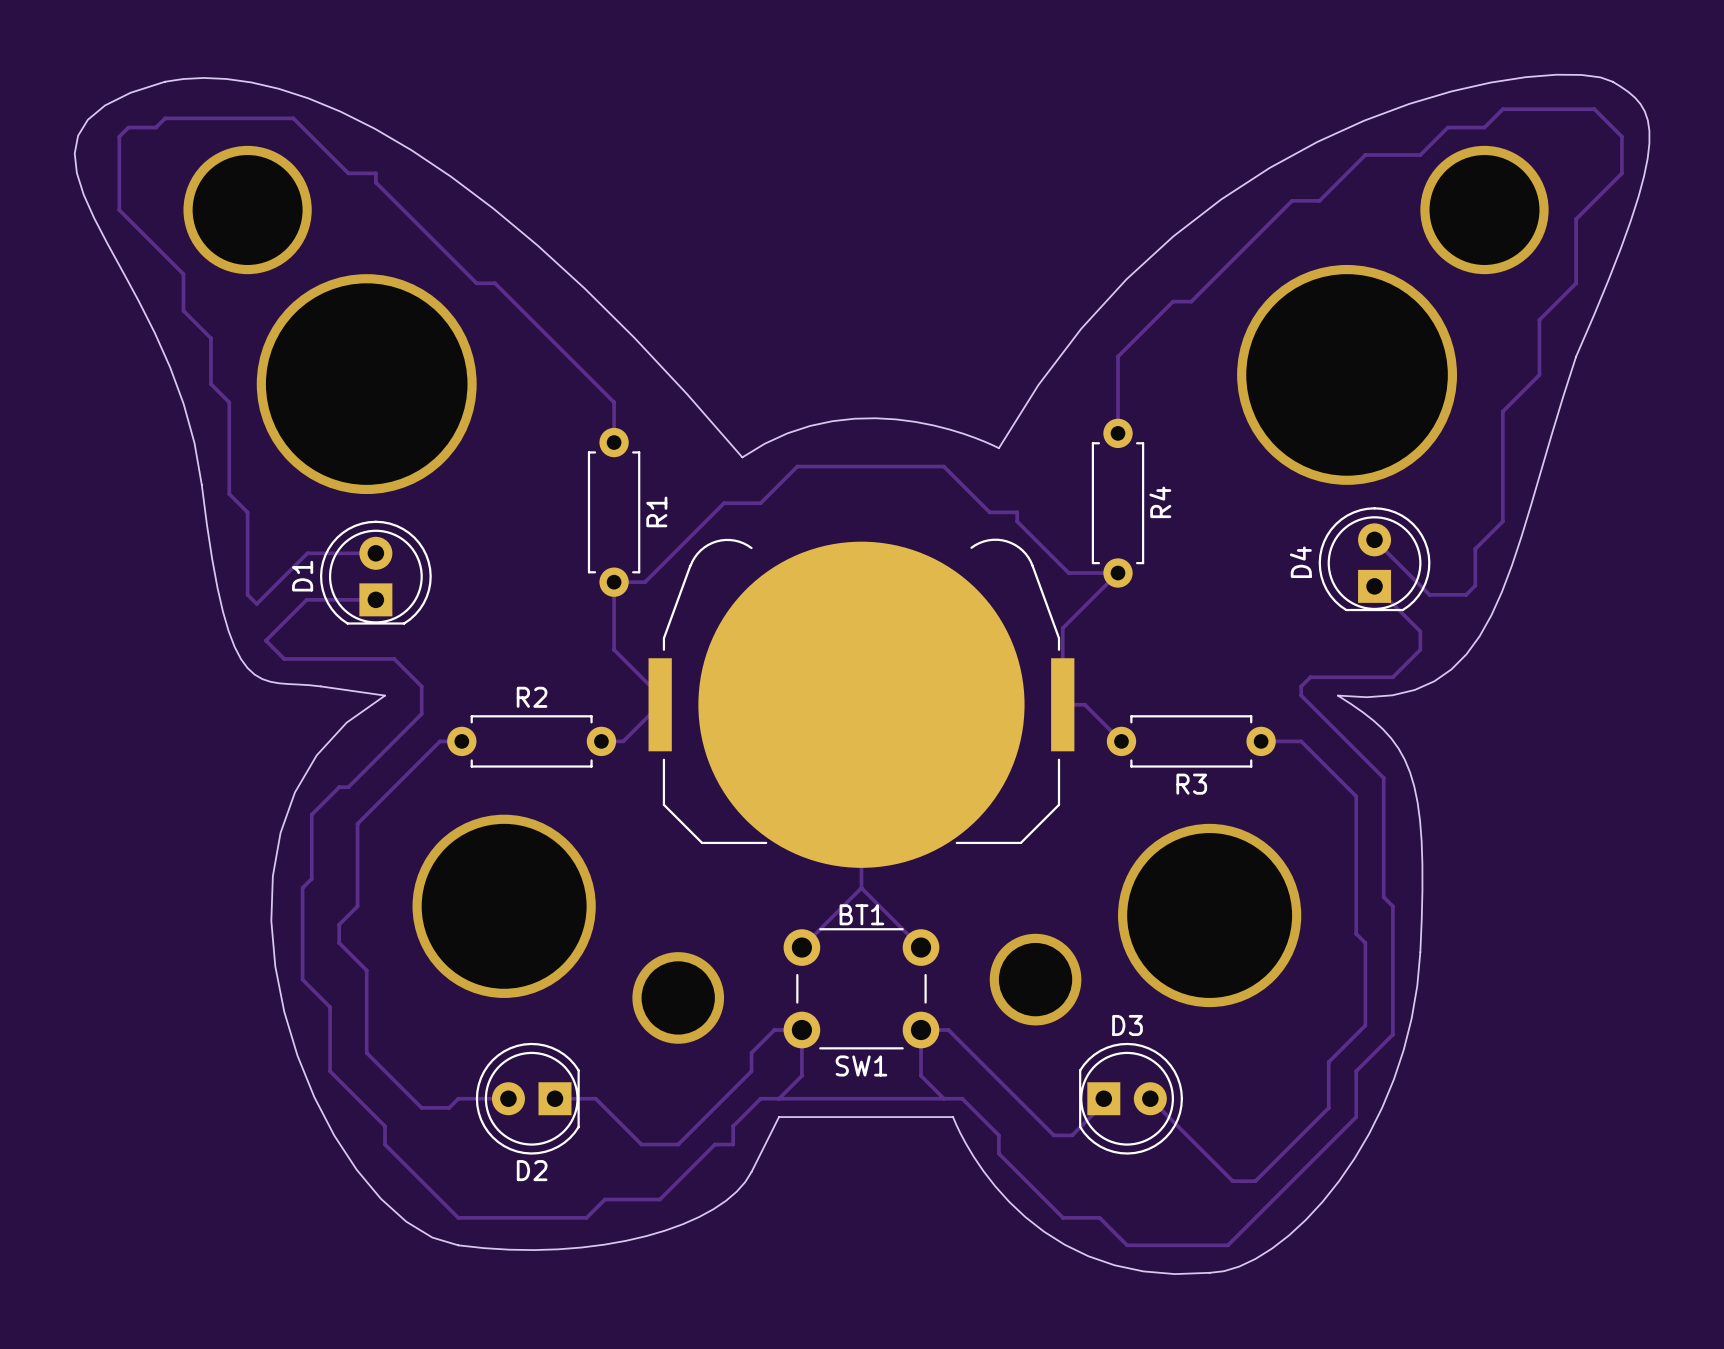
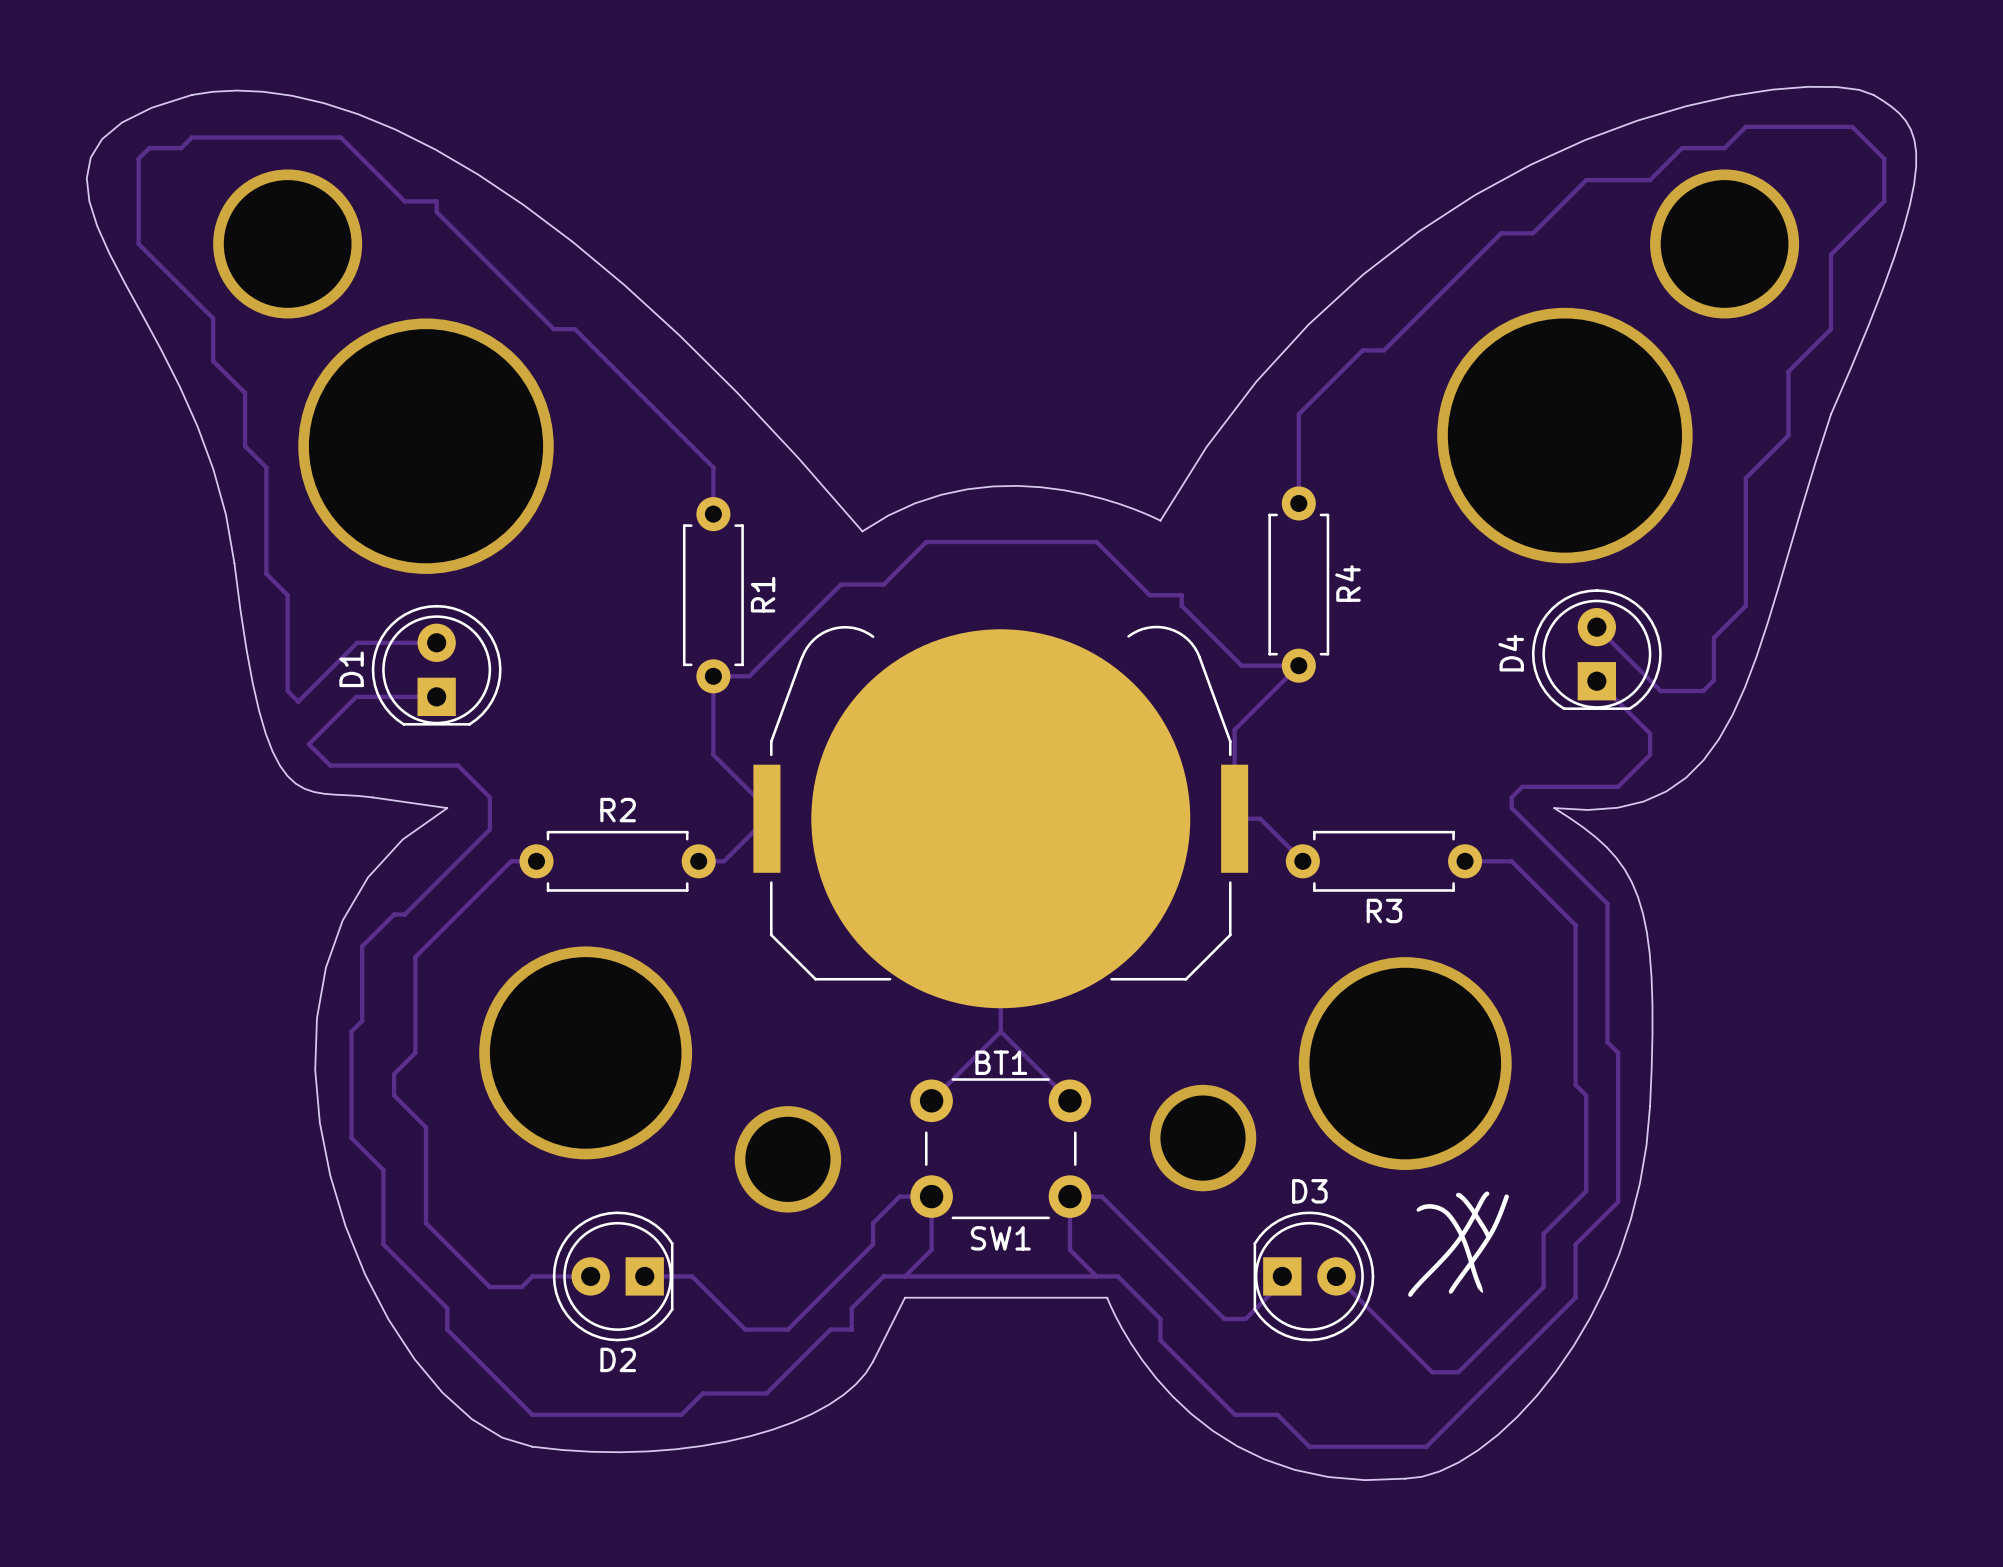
drawing: none -> [1408, 1191, 1509, 1297]

